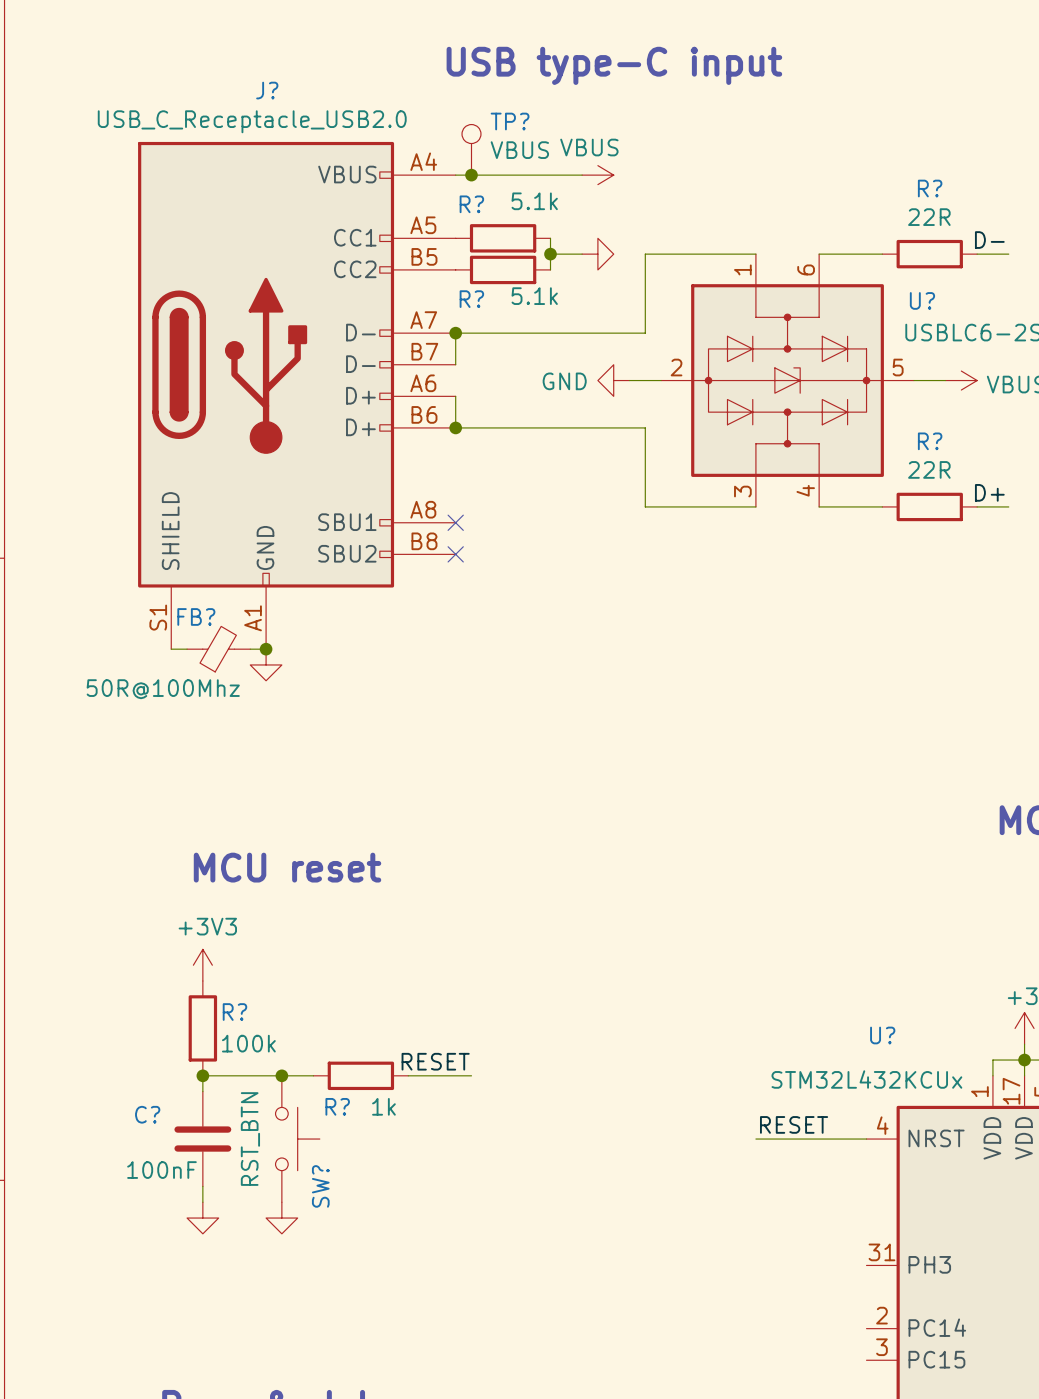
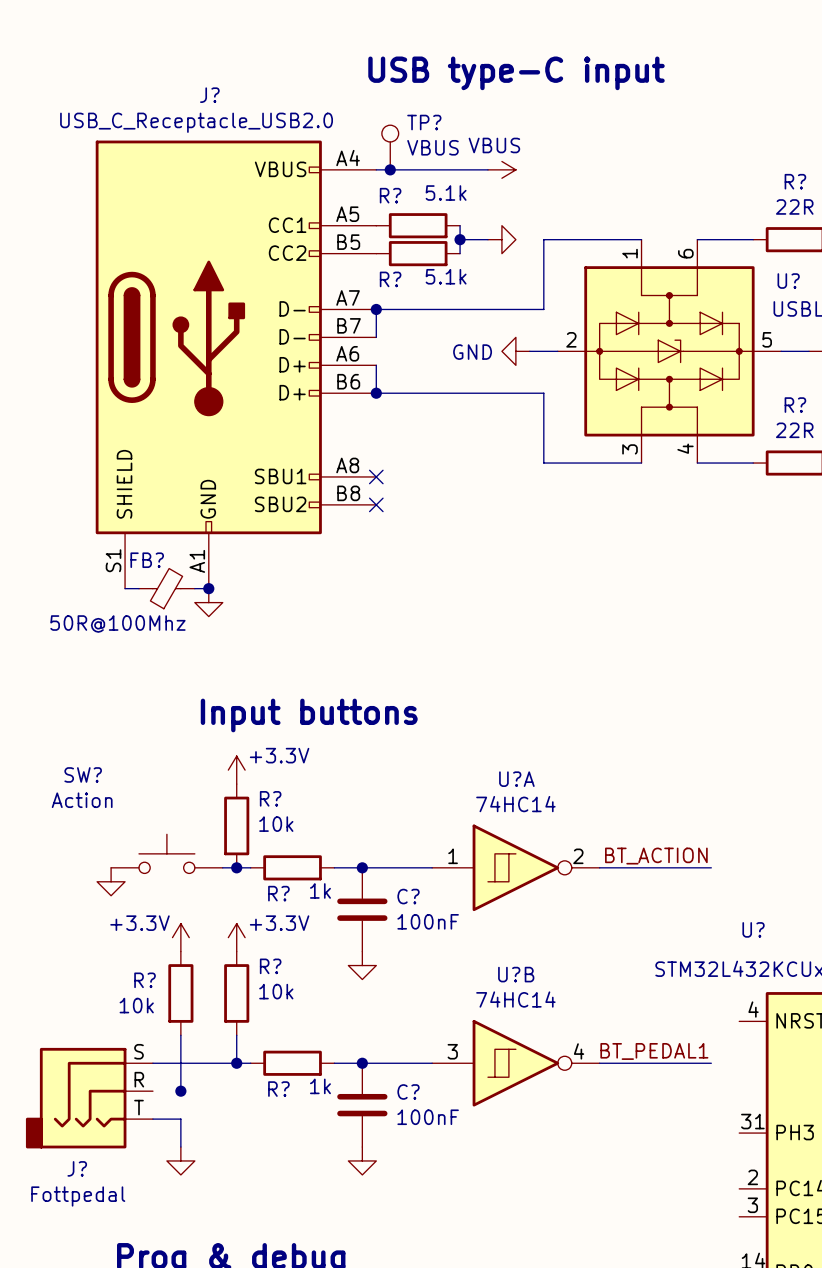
text: none -> Input buttons (309, 715)
power symbol: none -> +3.3V (236, 770)
text: MCU reset (287, 867) -> none
R?: none -> 10k (236, 825)
SW?: none -> Action (166, 853)
label: none -> BT_ACTION (656, 856)
power symbol: +3V3 (202, 965) -> none
wire: none -> (222, 867) (250, 867)
junction: none -> (236, 867)
R?: none -> 1k (292, 867)
wire: none -> (334, 867) (432, 867)
junction: none -> (362, 867)
U?A: none -> 74HC14 (515, 867)
wire: none -> (599, 867) (711, 867)
power symbol: none -> (111, 881)
C?: none -> 100nF (362, 909)
R?: 100k (202, 1028) -> none
power symbol: none -> +3.3V (180, 937)
power symbol: none -> +3.3V (236, 937)
label: RESET (435, 1061) -> none
junction: (202, 1075) -> none
junction: (281, 1075) -> none
wire: (313, 1075) (202, 1075) (202, 1091) -> none
R?: 1k (360, 1075) -> none
wire: (408, 1075) (471, 1075) -> none
power symbol: none -> (362, 965)
R?: none -> 10k (180, 993)
R?: none -> 10k (236, 993)
label: RESET (794, 1124) -> none
C?: 100nF (202, 1139) -> none
SW?: RST_BTN (297, 1139) -> none
wire: (755, 1139) (866, 1139) -> none
wire: none -> (180, 1035) (180, 1091)
wire: none -> (236, 1035) (236, 1063)
label: none -> BT_PEDAL1 (654, 1051)
wire: (202, 1186) (202, 1202) -> (152, 1063) (250, 1063)
junction: none -> (236, 1063)
R?: none -> 1k (292, 1063)
wire: none -> (334, 1063) (432, 1063)
junction: none -> (362, 1063)
U?B: none -> 74HC14 (515, 1063)
wire: none -> (599, 1063) (711, 1063)
power symbol: (202, 1218) -> none
junction: none -> (180, 1091)
power symbol: (281, 1218) -> none
J?: none -> Fottpedal (89, 1098)
C?: none -> 100nF (362, 1105)
wire: none -> (152, 1119) (180, 1119) (180, 1147)
power symbol: none -> (180, 1160)
power symbol: none -> (362, 1160)

